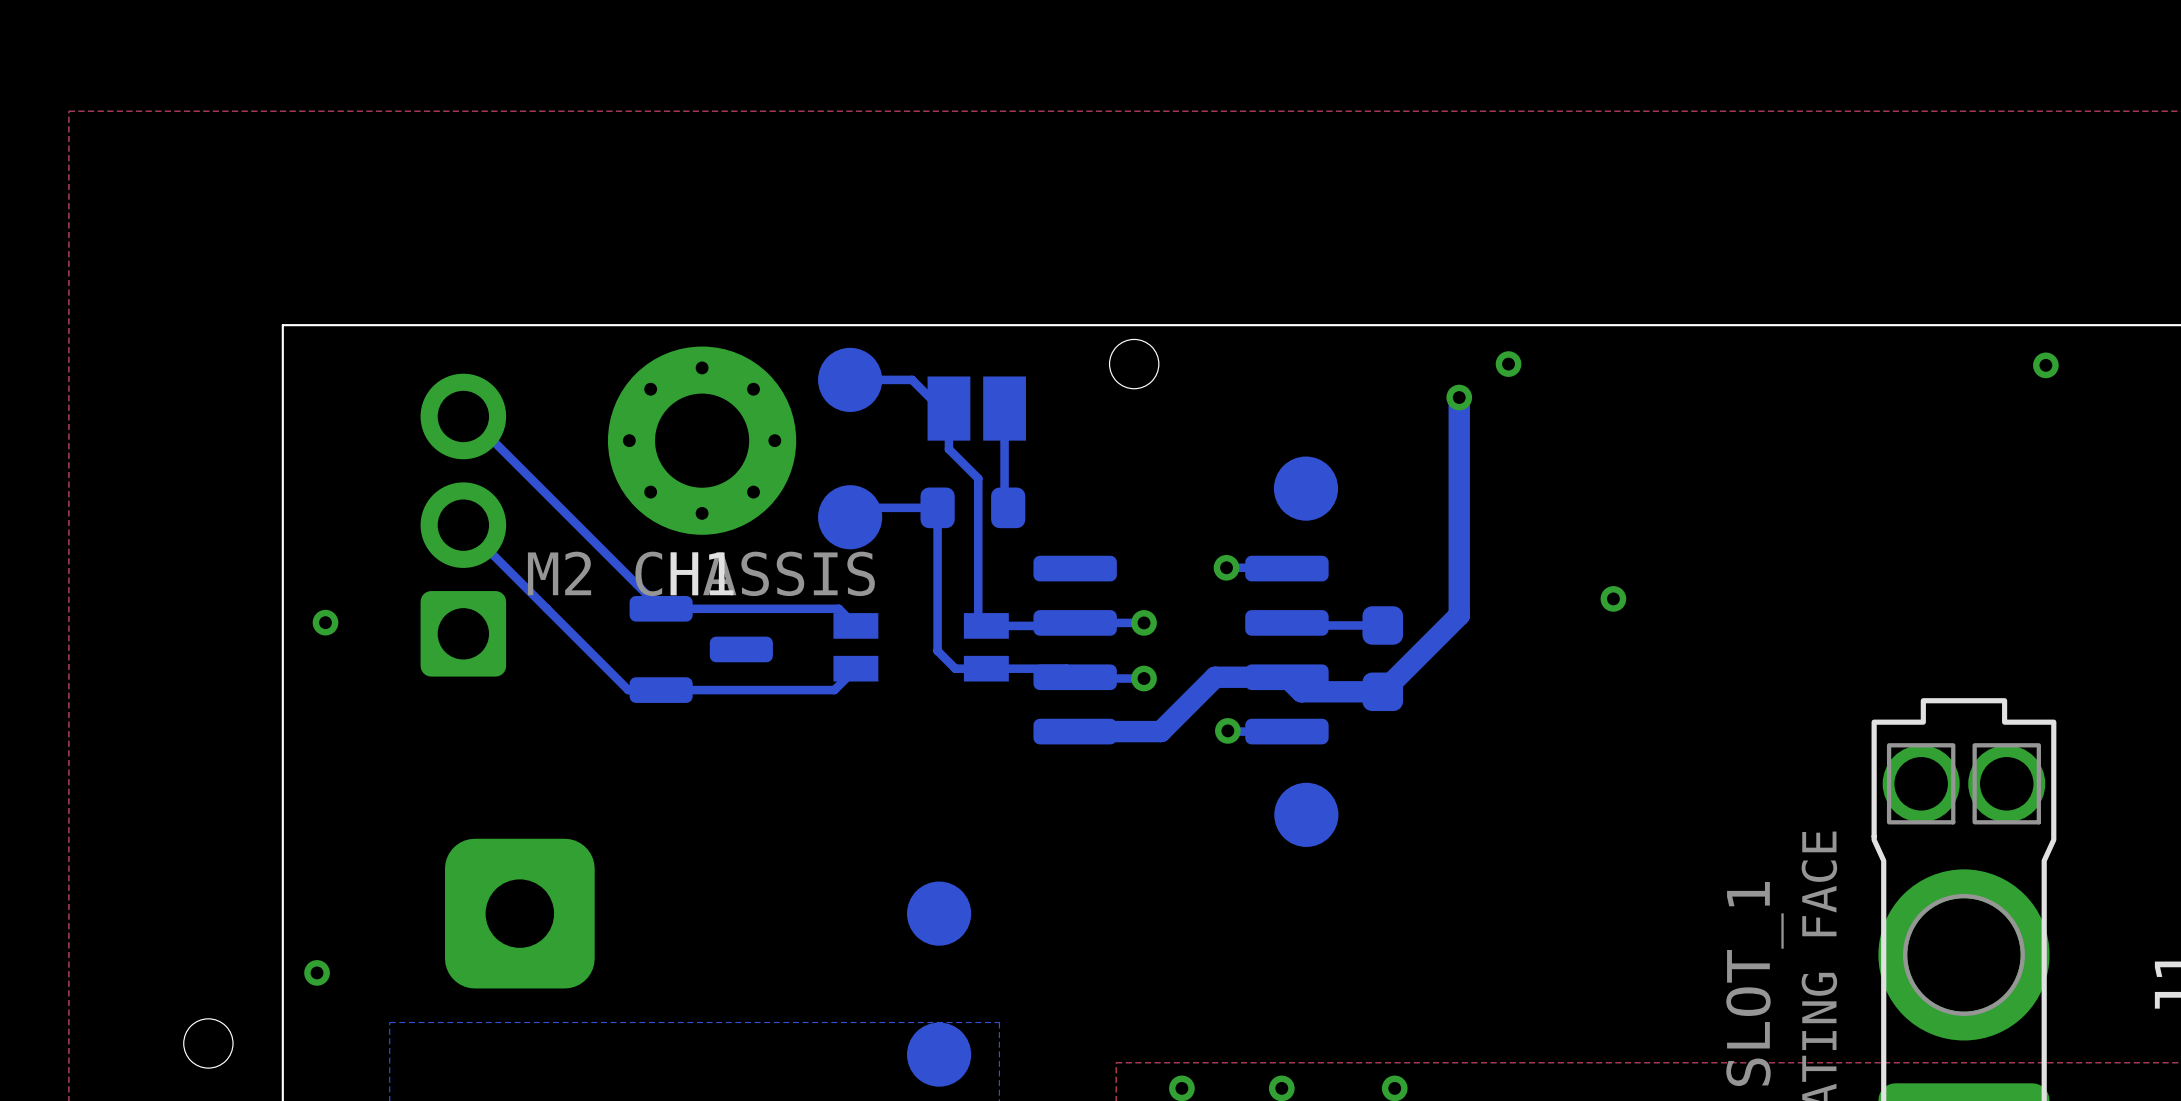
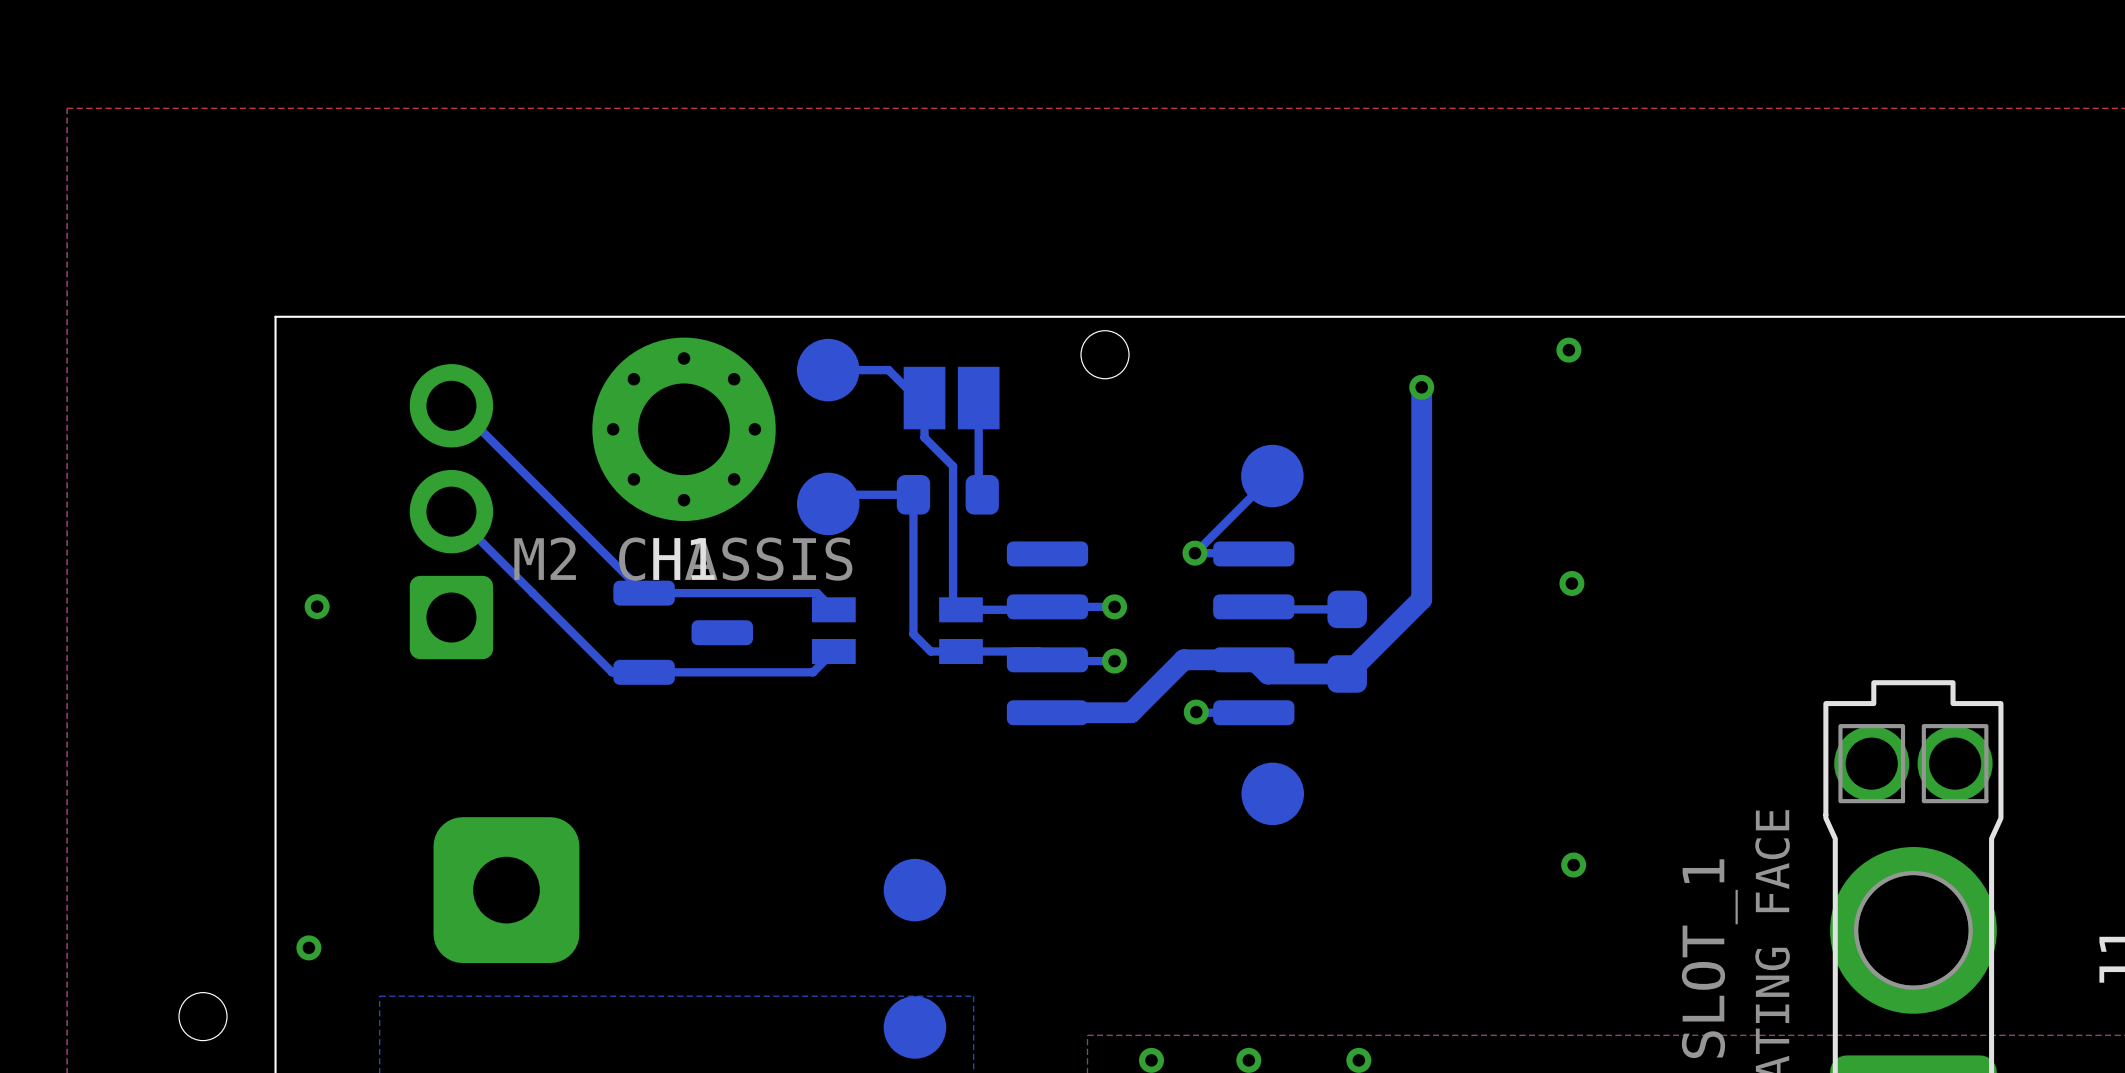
via position: (1508, 364) -> (1568, 350)
via: (2045, 365) -> none
bottom track: none -> (1272, 476) (1195, 553)
via: none -> (1573, 865)

